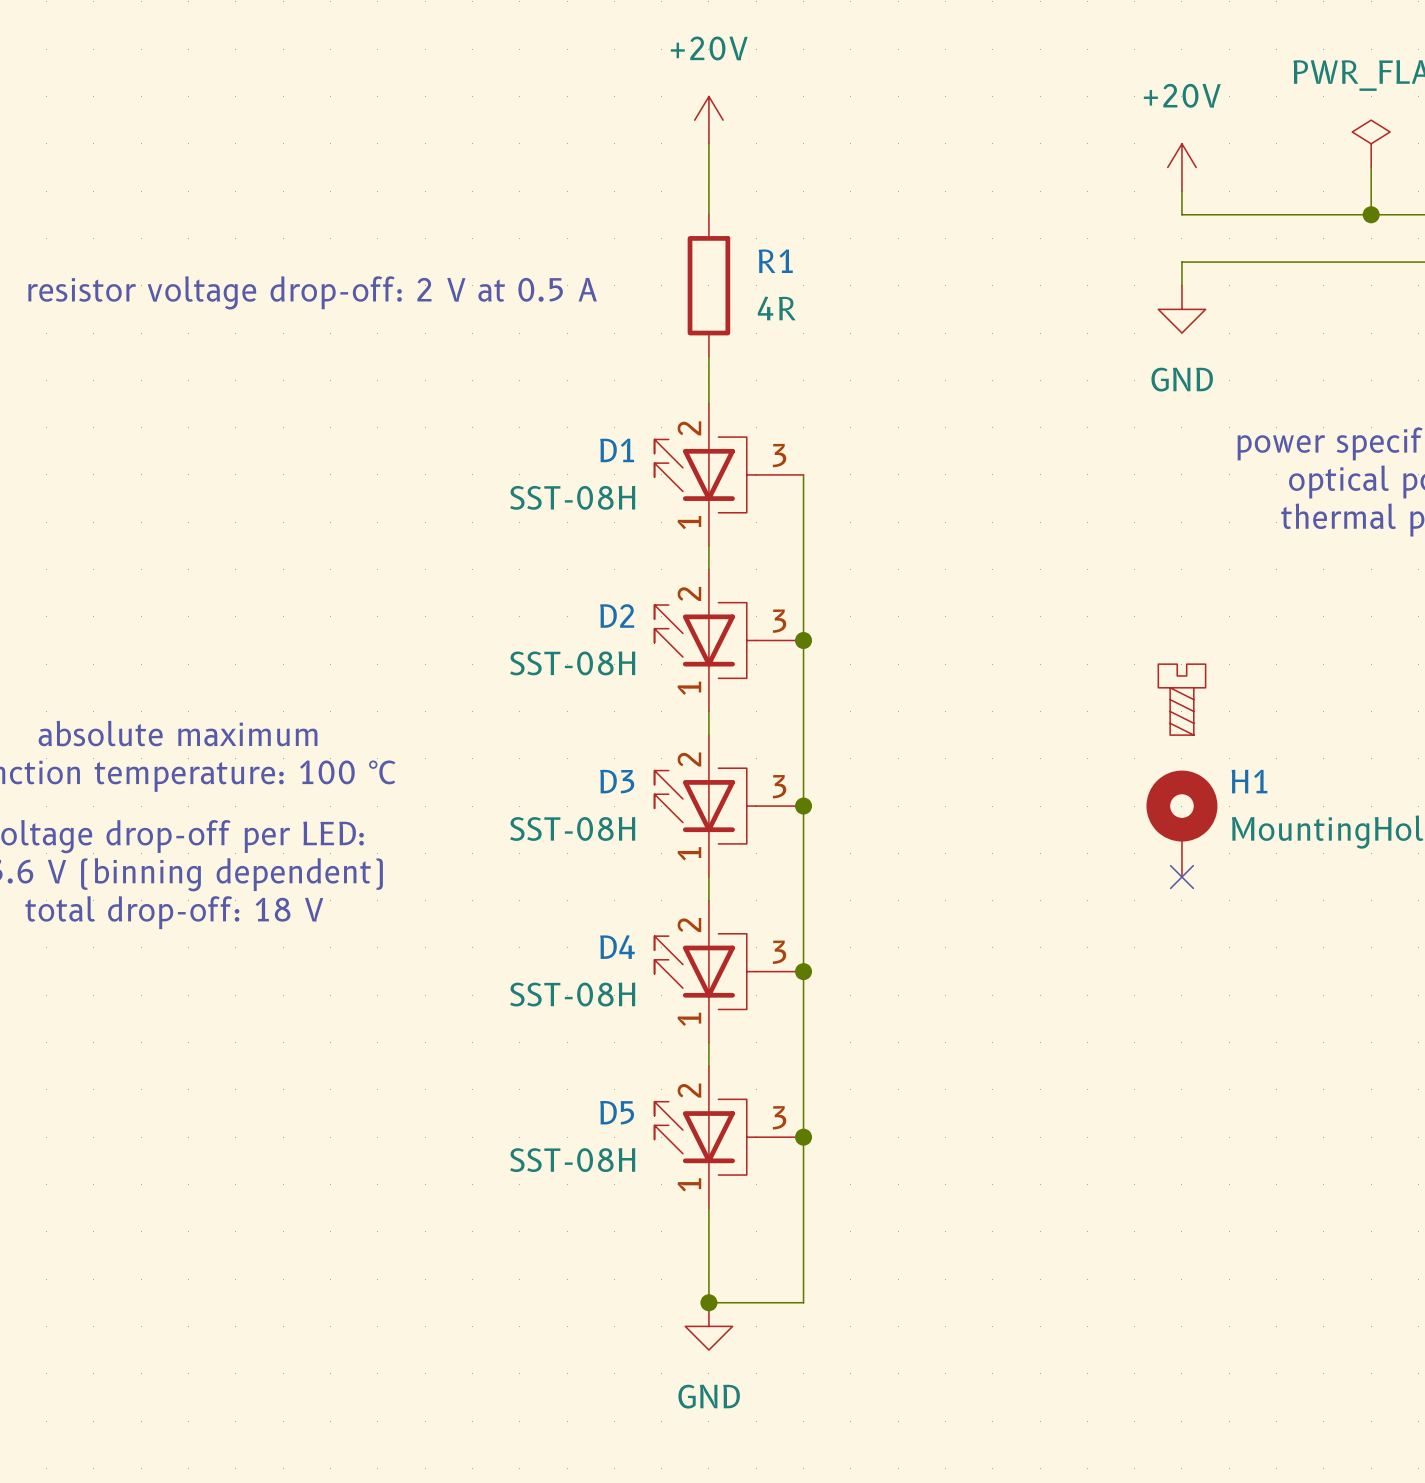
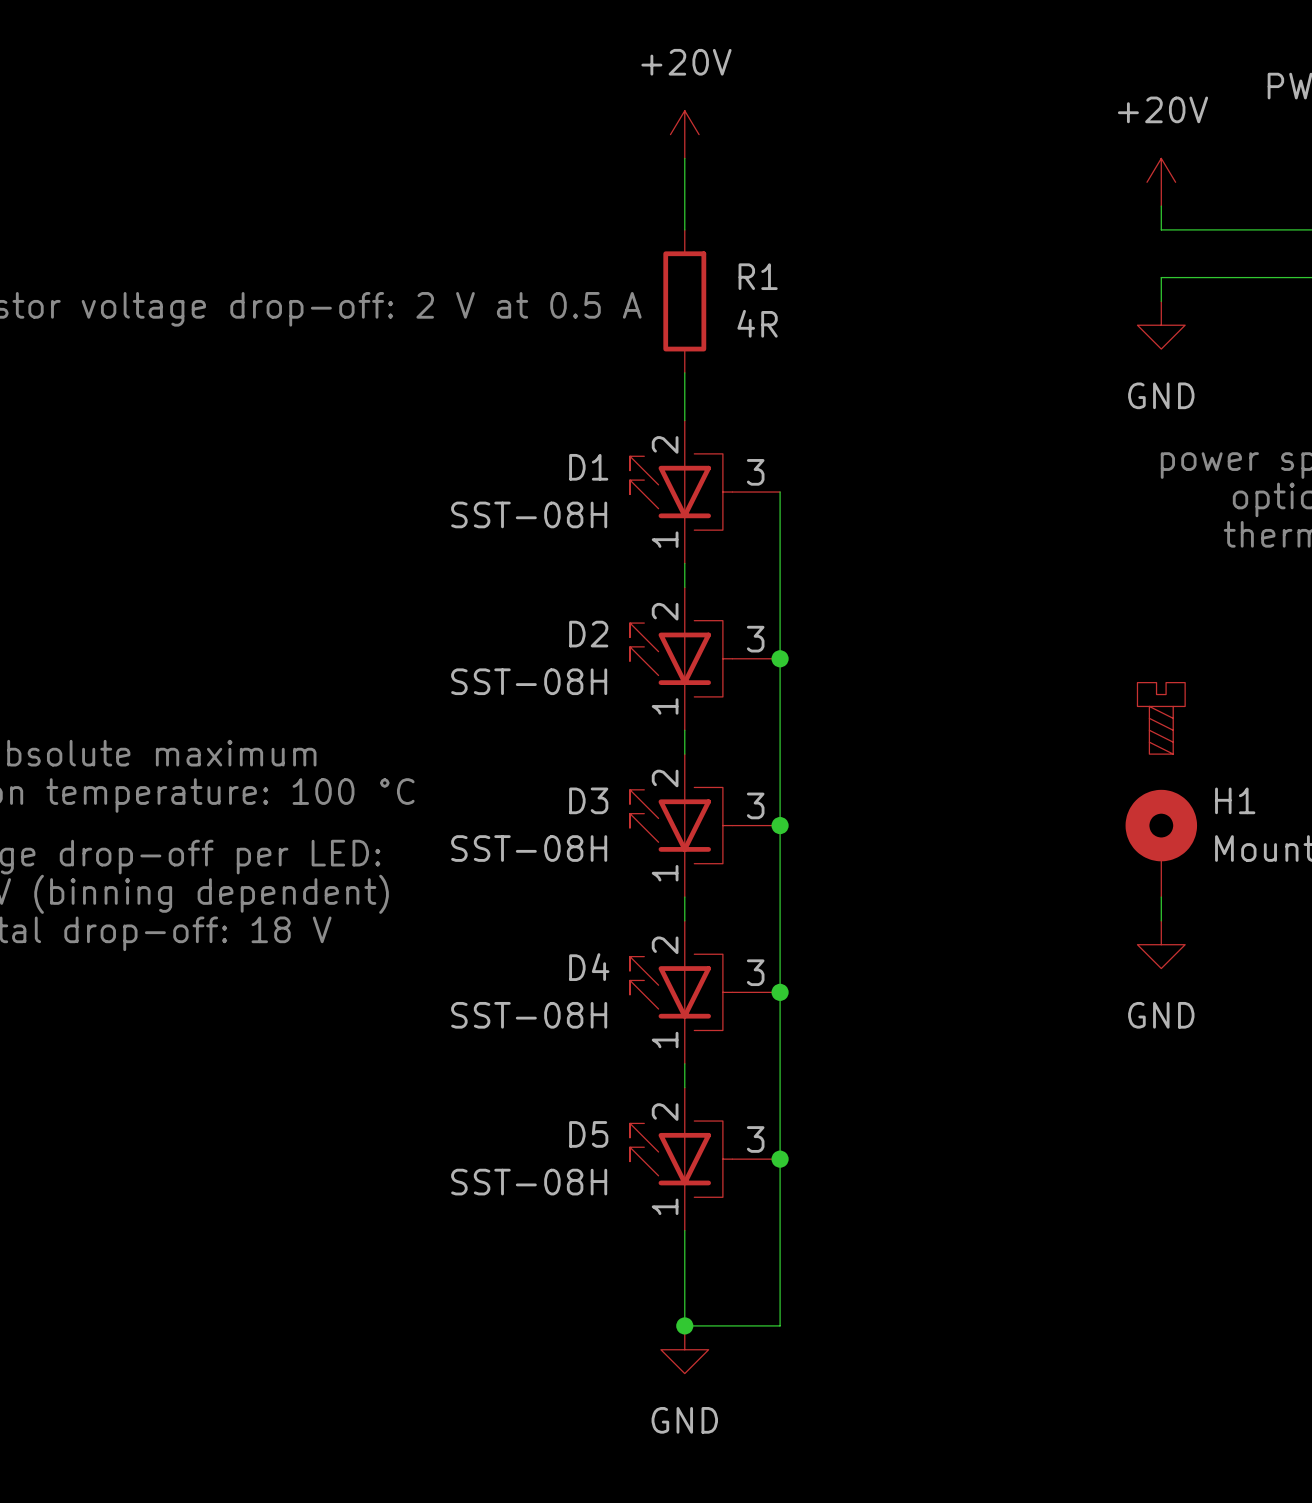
wire: none -> (1161, 897) (1161, 920)
no-connect mark: (1181, 877) -> none
power symbol: none -> GND (1161, 944)

